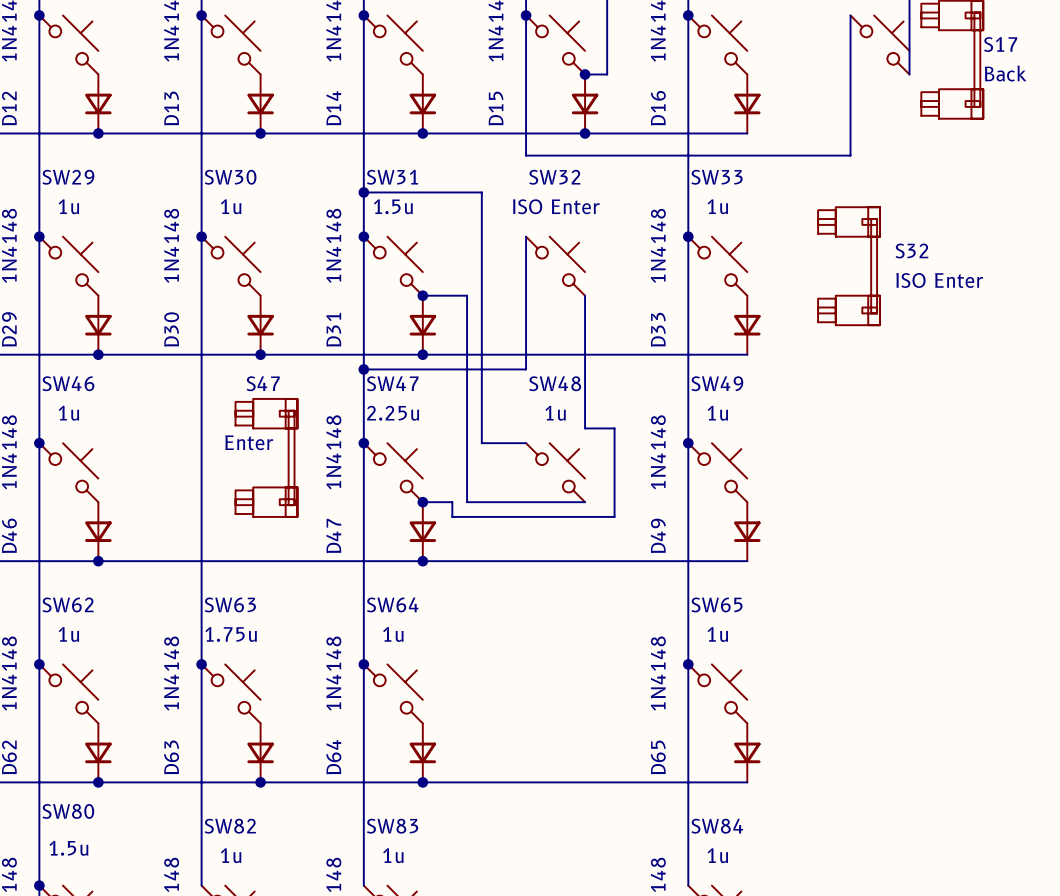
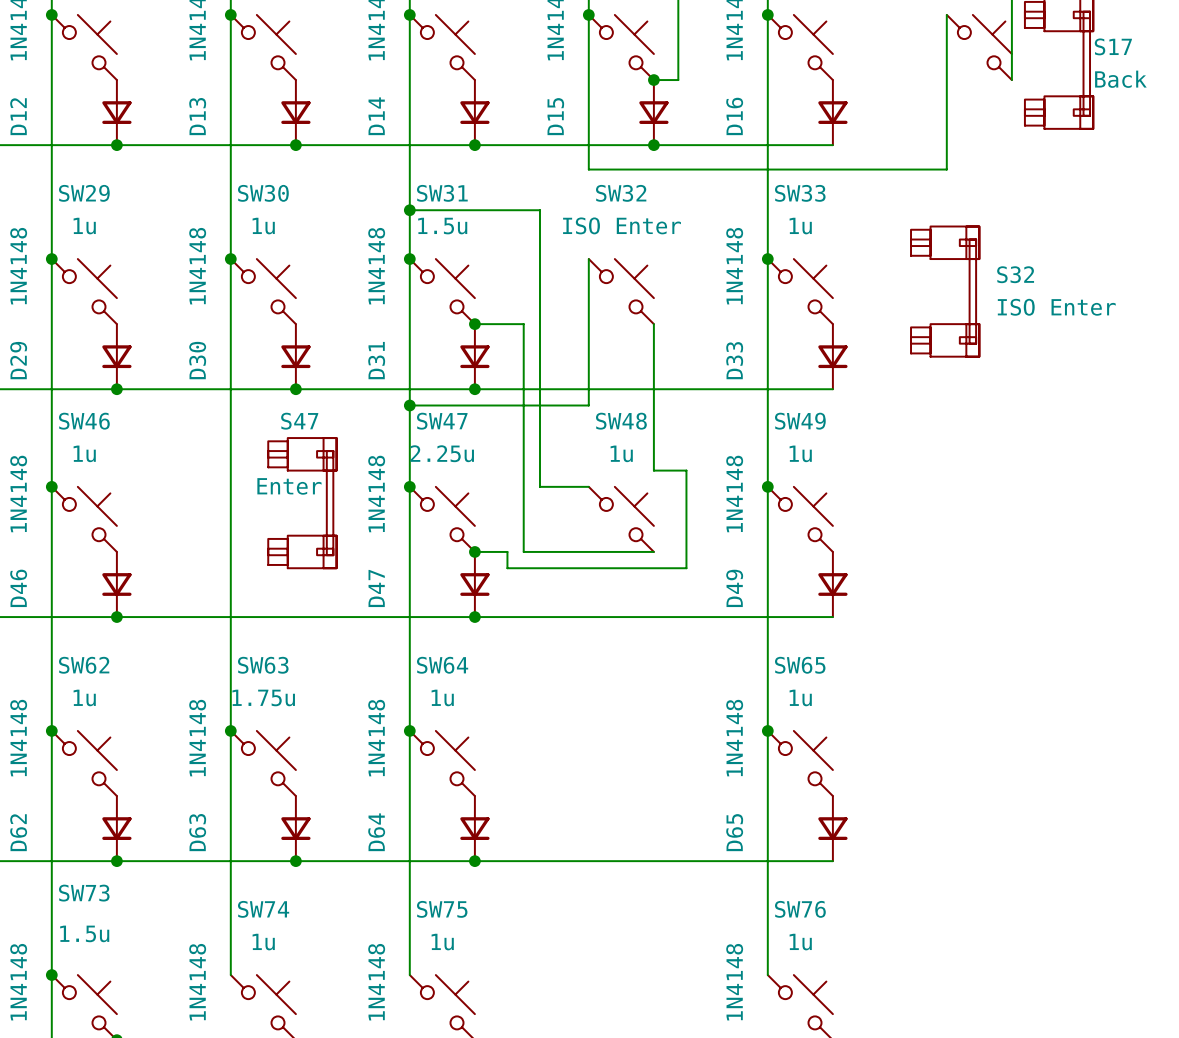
SW80 name: SW80 (68, 811) -> SW73 (84, 893)
SW82 name: SW82 (230, 826) -> SW74 (263, 909)
SW83 name: SW83 (392, 826) -> SW75 (442, 909)
SW84 name: SW84 (717, 826) -> SW76 (800, 909)

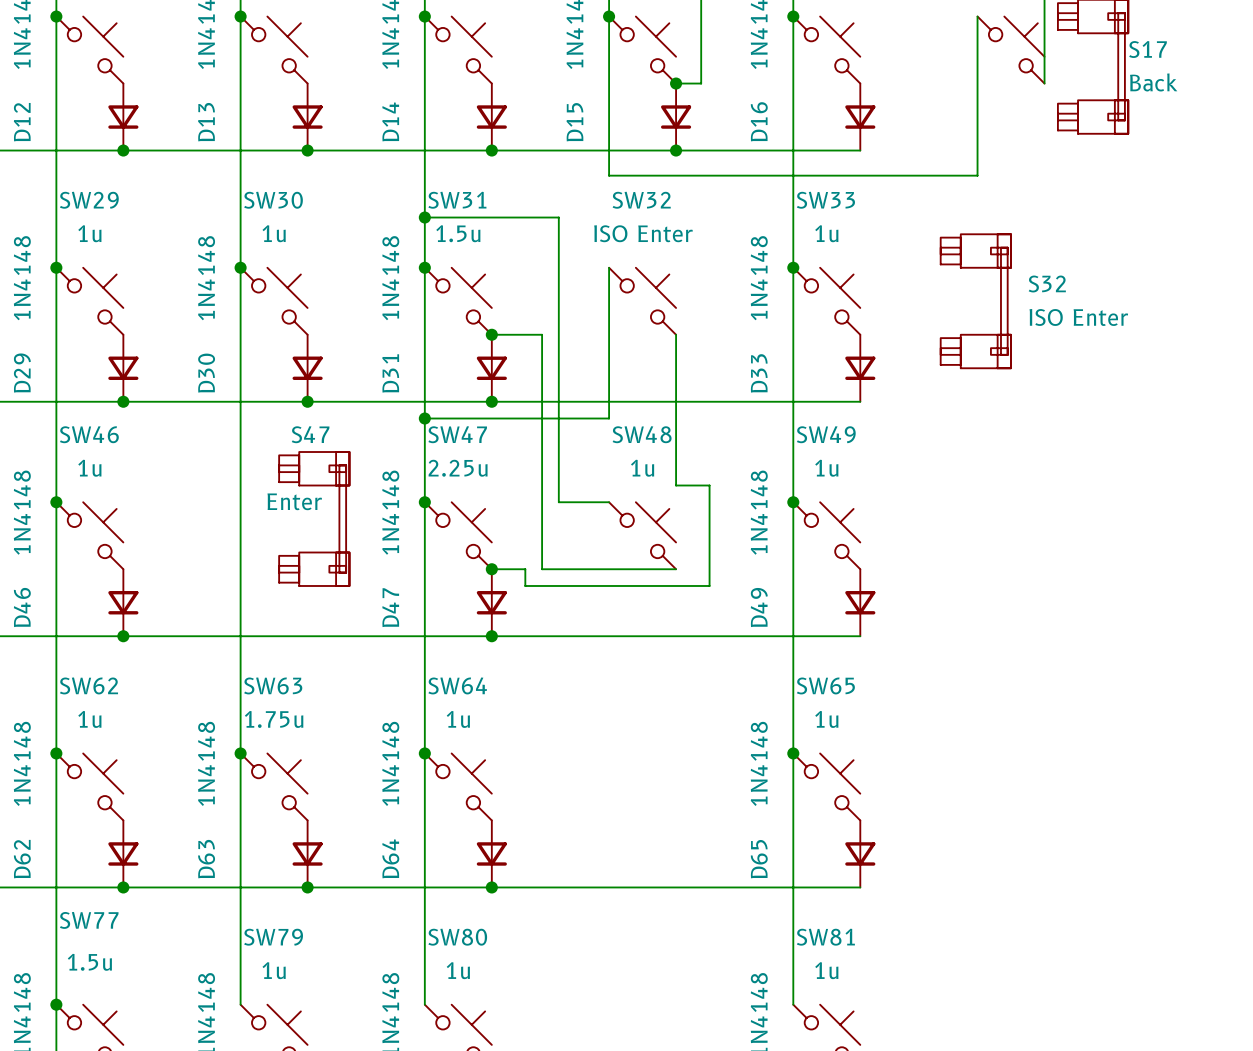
SW73 name: SW73 (84, 893) -> SW77 (89, 920)
SW74 name: SW74 (263, 909) -> SW79 (273, 937)
SW75 name: SW75 (442, 909) -> SW80 (457, 937)
SW76 name: SW76 (800, 909) -> SW81 (825, 937)

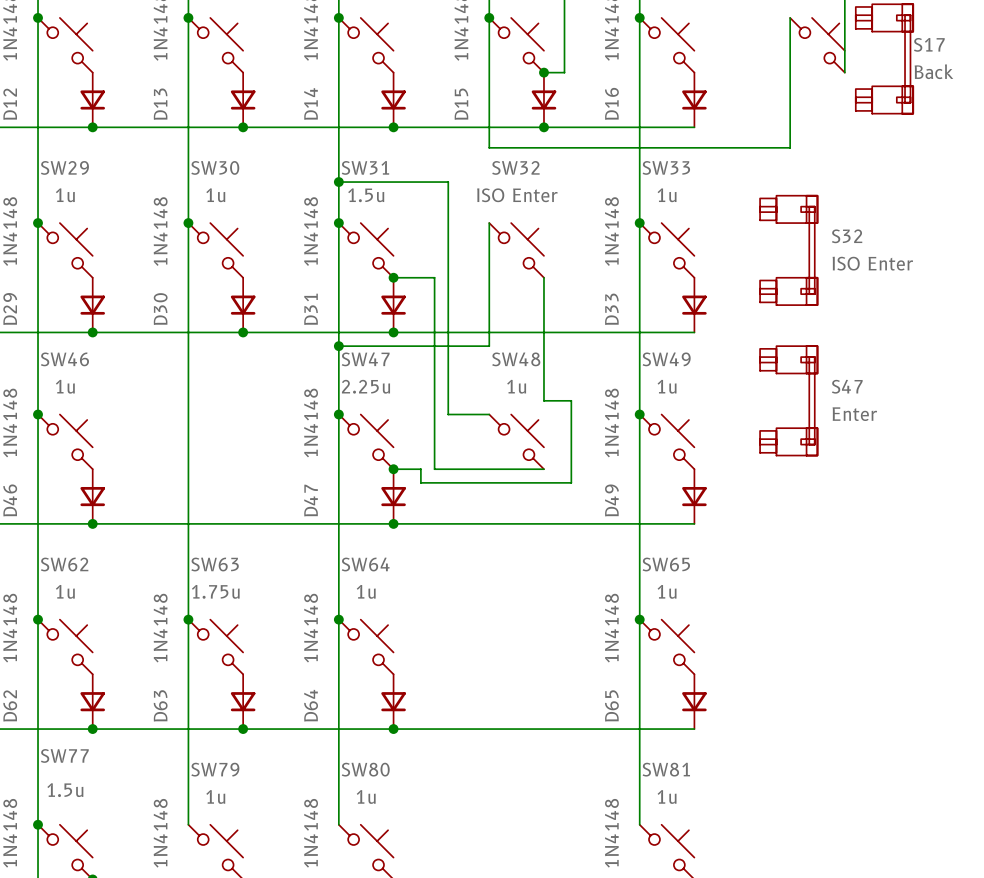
S47 name position: S47 (310, 434) -> S47 (847, 386)
S47 value position: Enter (294, 501) -> Enter (854, 414)
S47 position: (314, 518) -> (788, 400)

